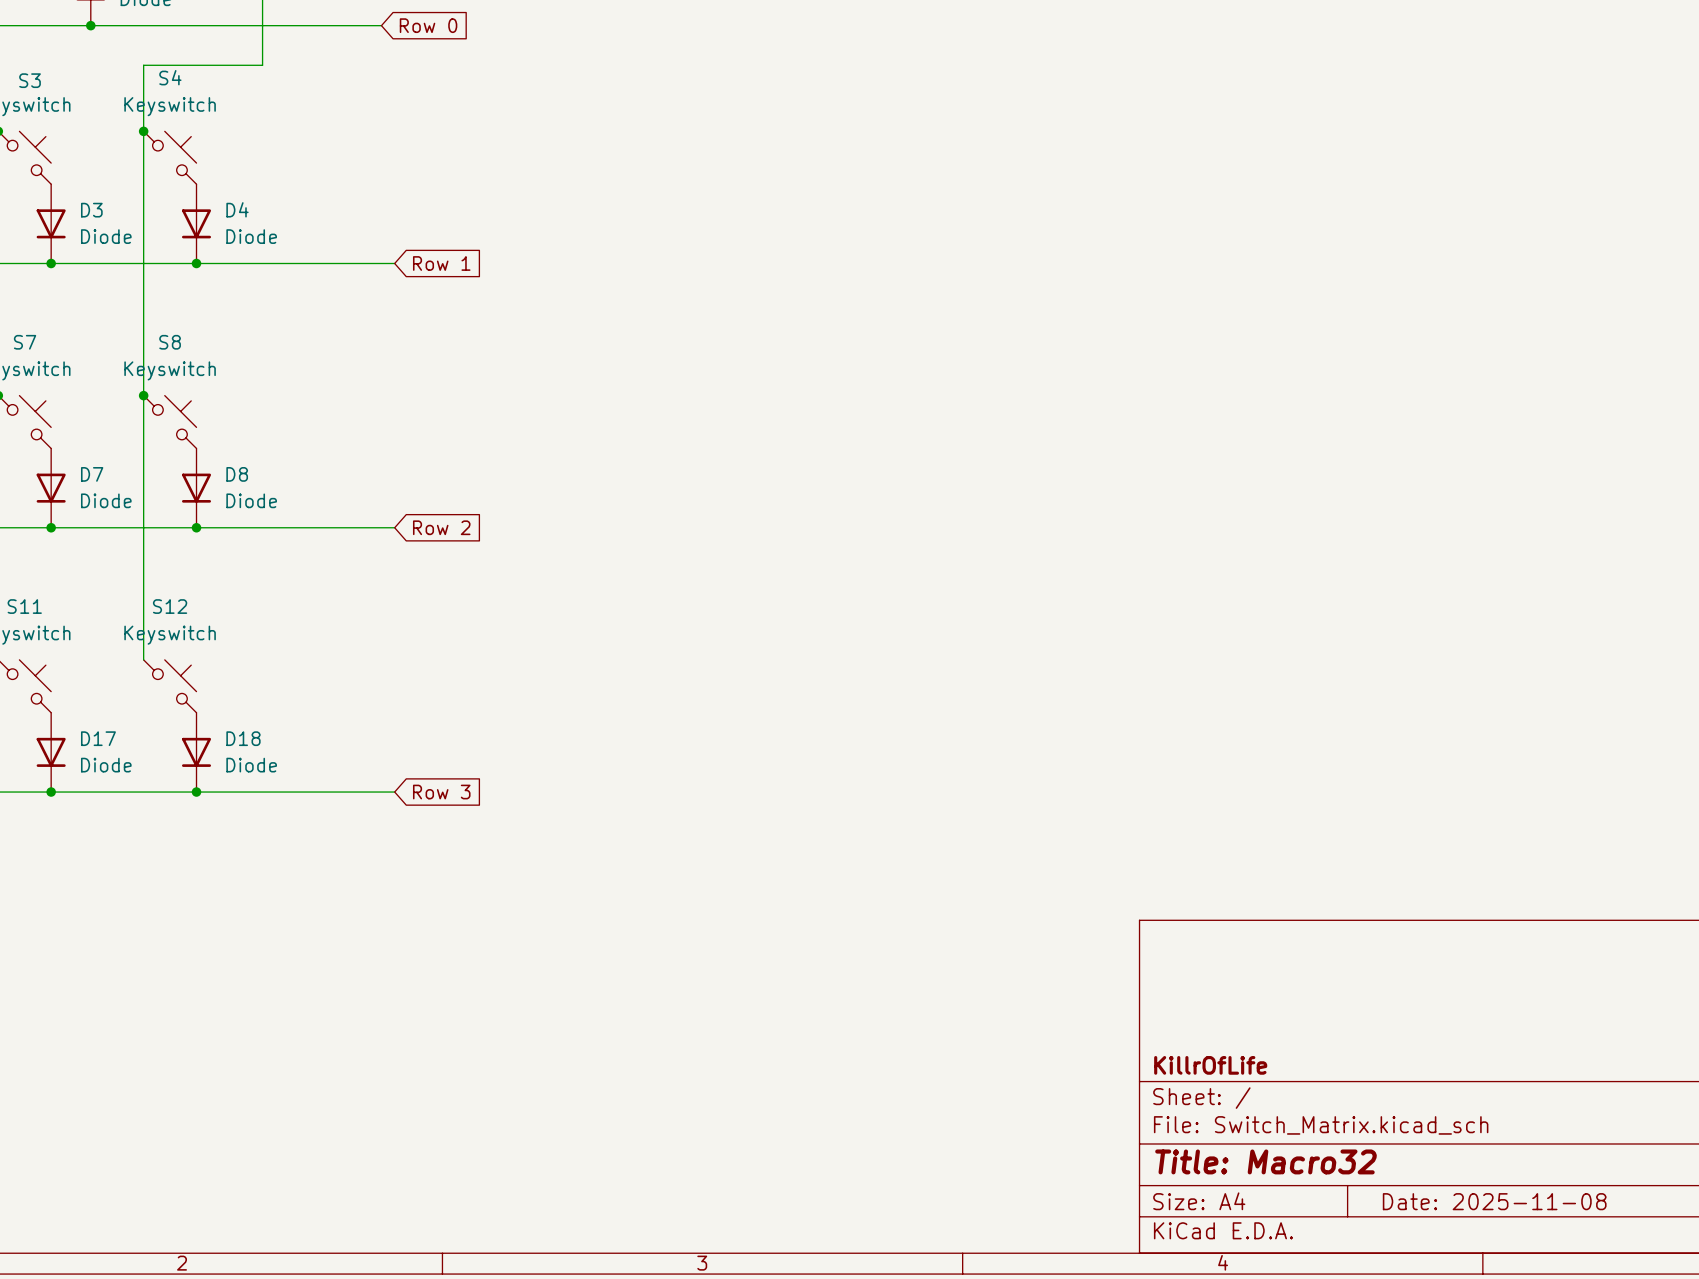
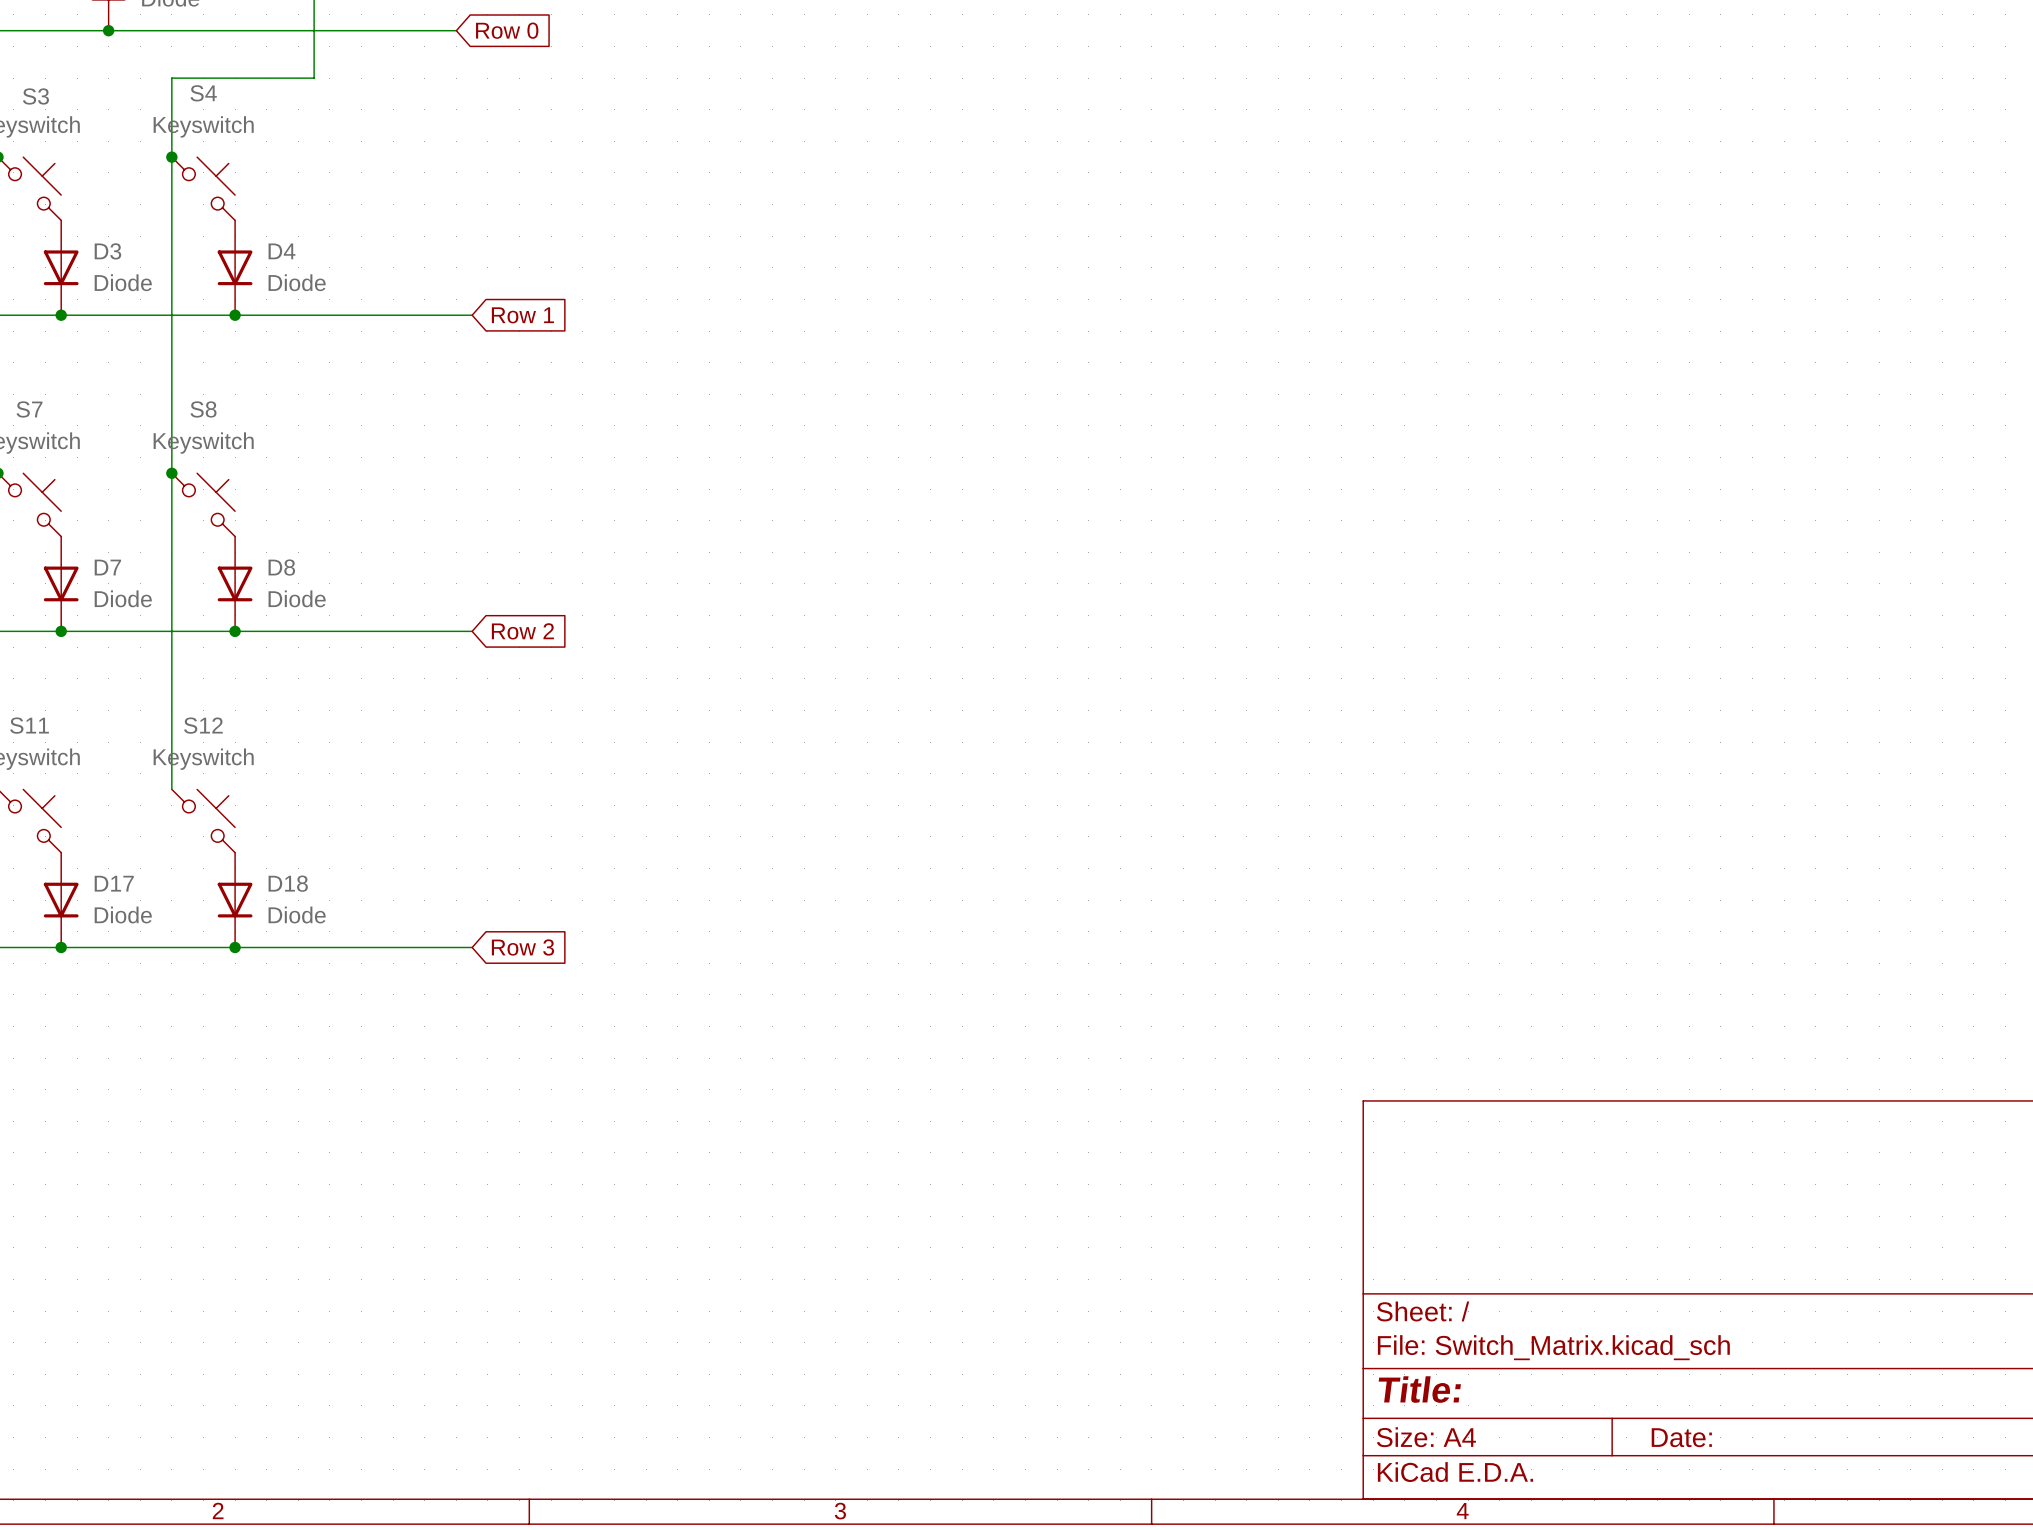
title block: KillrOfLife (1210, 1065) -> none
title block: Title: Macro32 (1266, 1161) -> Title: (1419, 1389)
title block: Date: 2025-11-08 (1494, 1201) -> Date: (1681, 1437)

